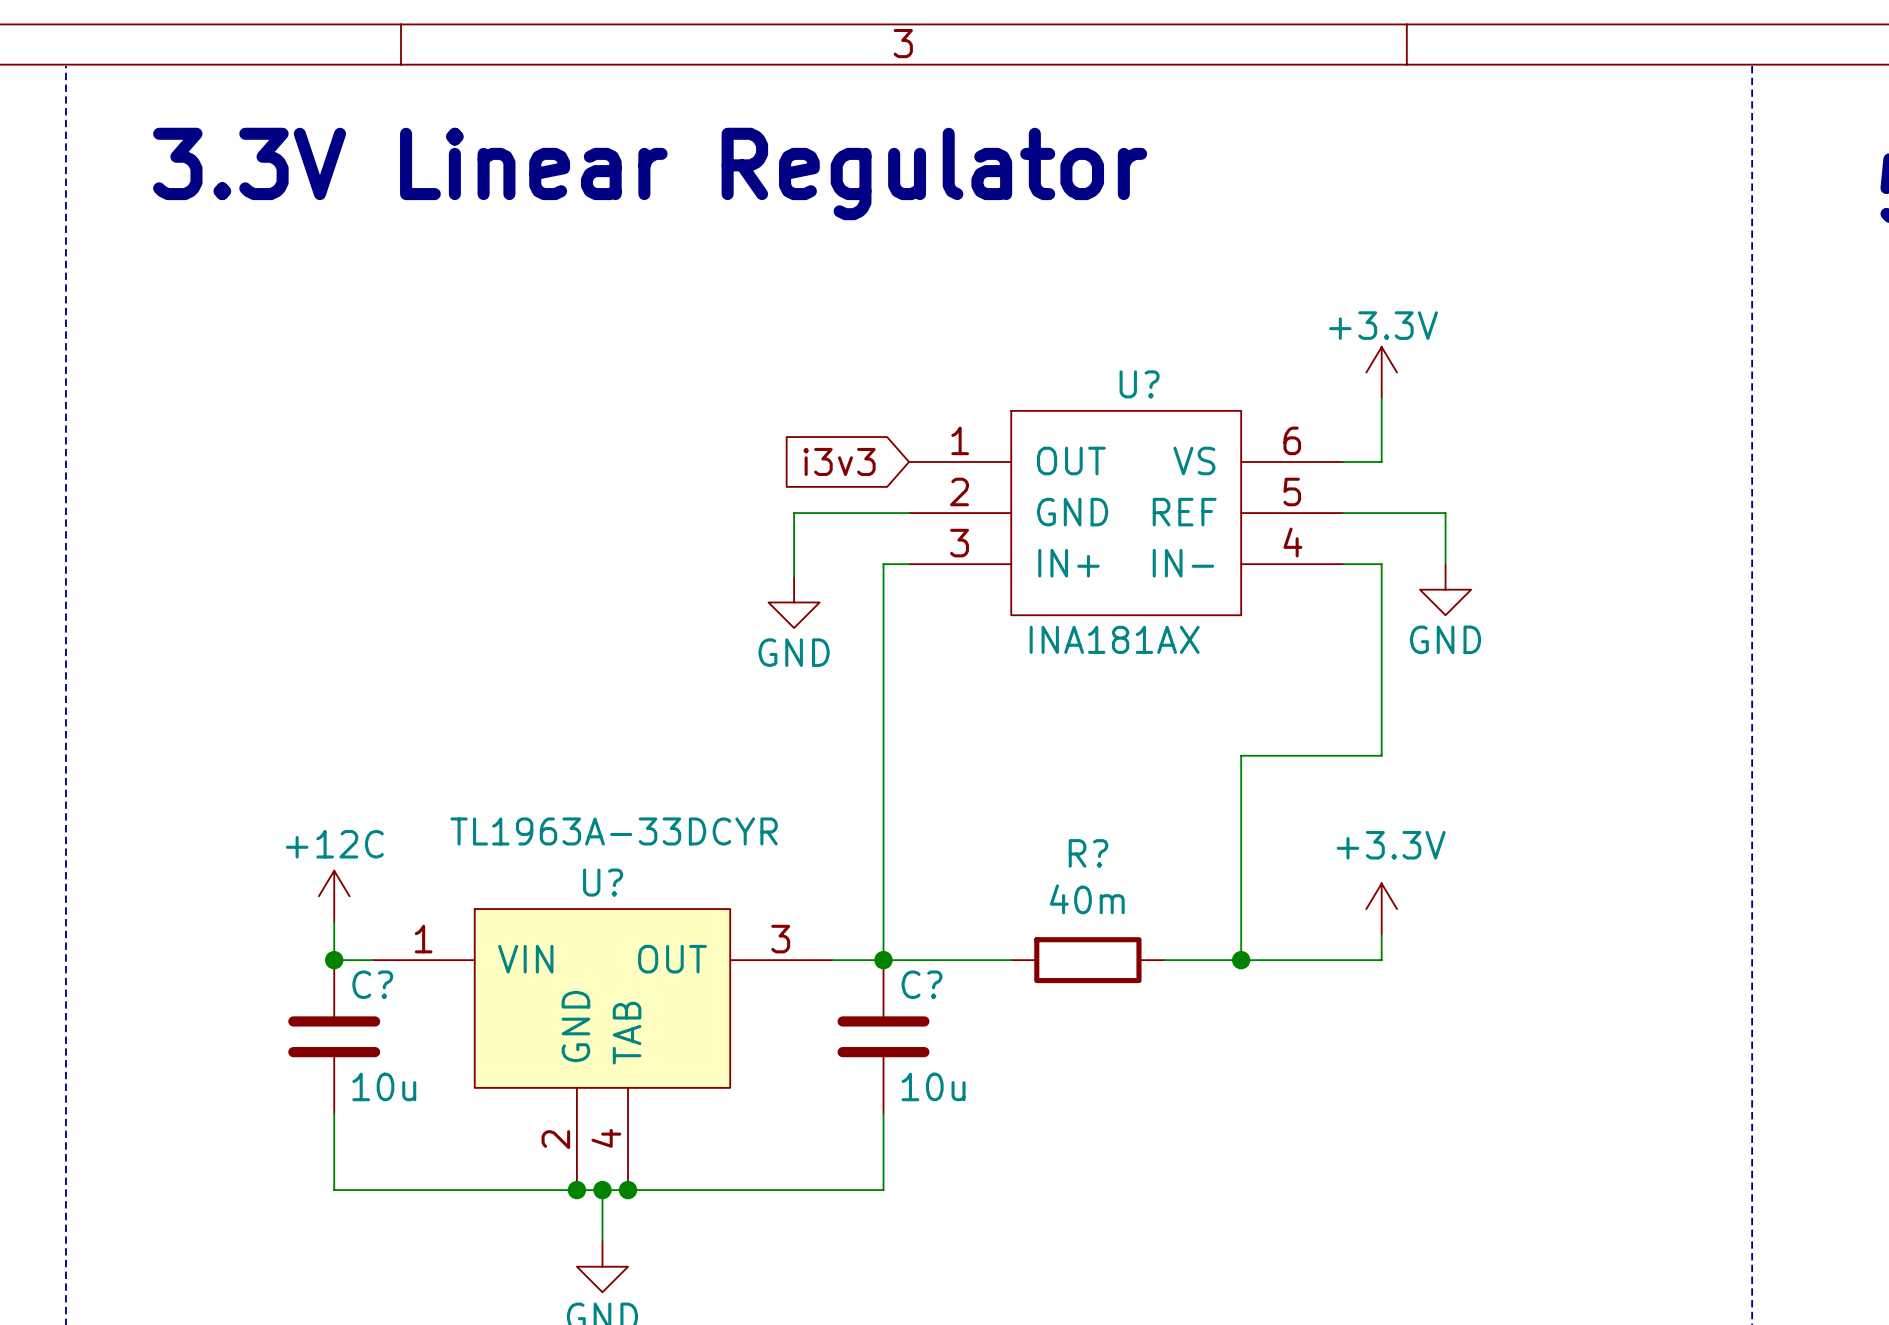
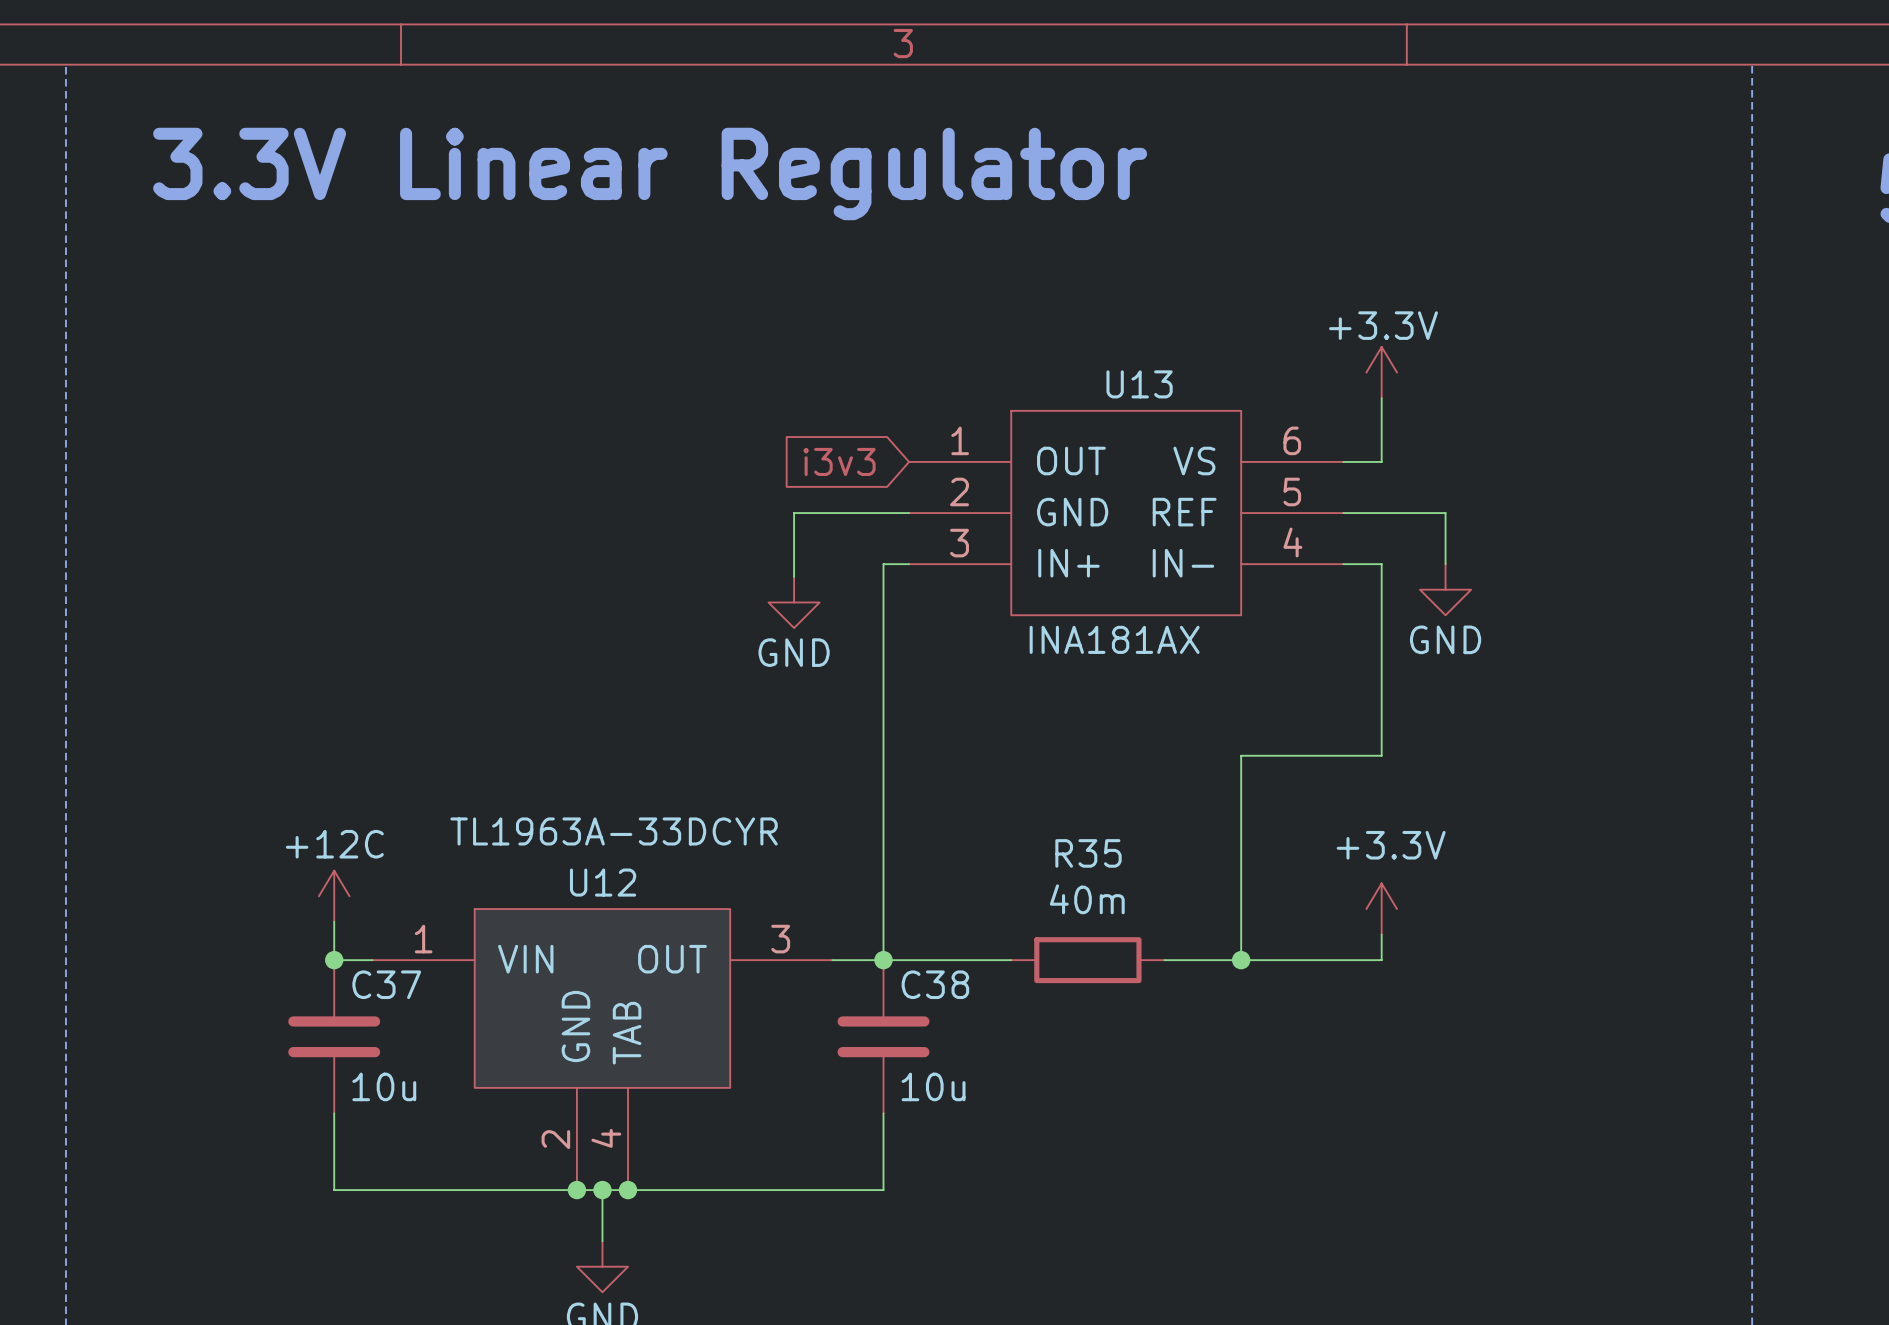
U? name: U? (1139, 384) -> U13 (1139, 384)
R? name: R? (1088, 853) -> R35 (1088, 853)
U? name: U? (603, 882) -> U12 (603, 882)
C? name: C? (372, 984) -> C37 (386, 984)
C? name: C? (922, 984) -> C38 (935, 984)

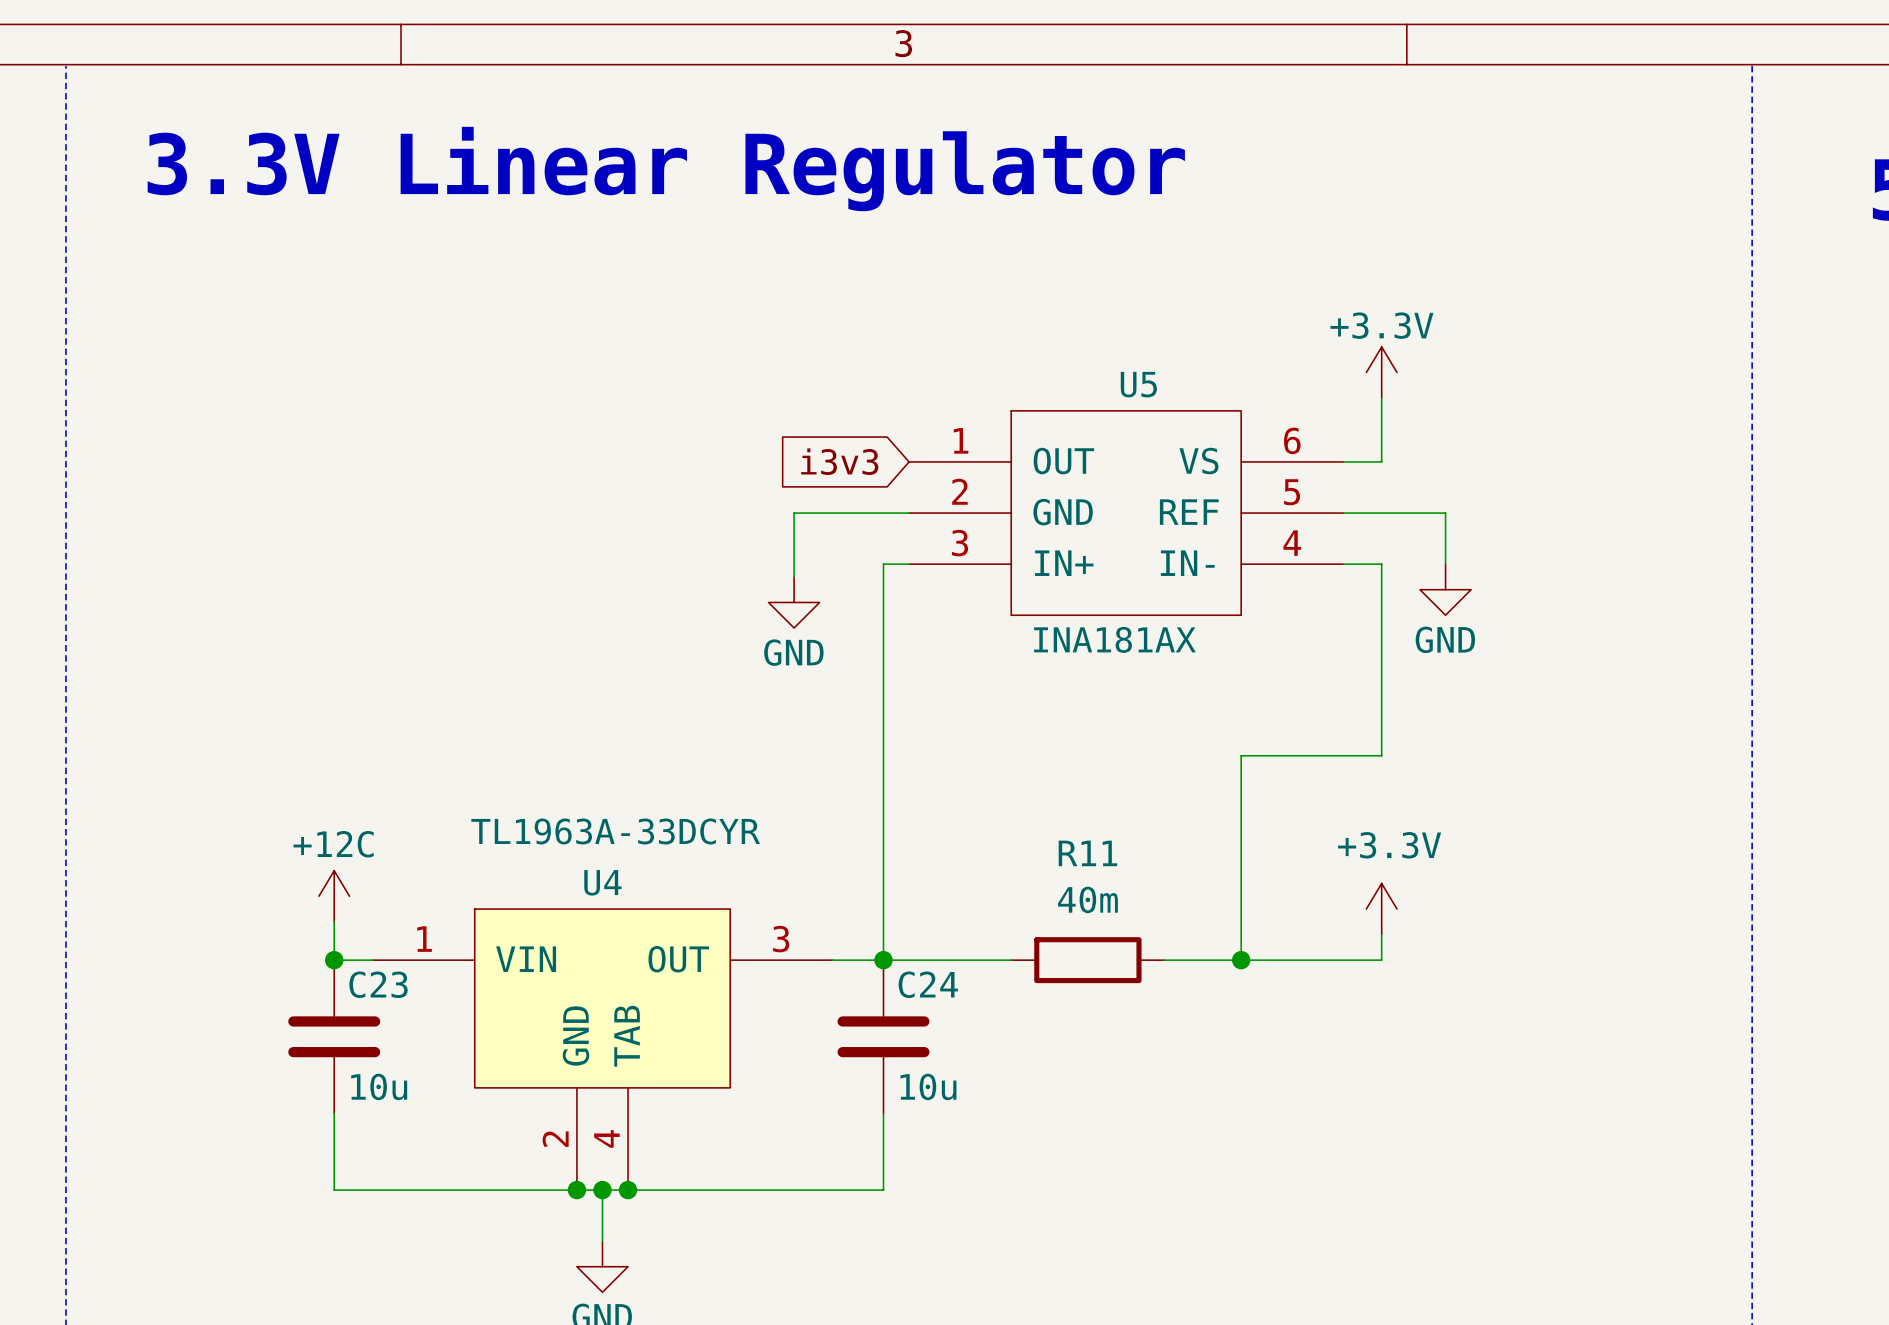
U13 name: U13 (1139, 384) -> U5 (1138, 384)
R35 name: R35 (1088, 853) -> R11 (1087, 853)
U12 name: U12 (603, 882) -> U4 (602, 882)
C37 name: C37 (386, 984) -> C23 (378, 984)
C38 name: C38 (935, 984) -> C24 (928, 984)

